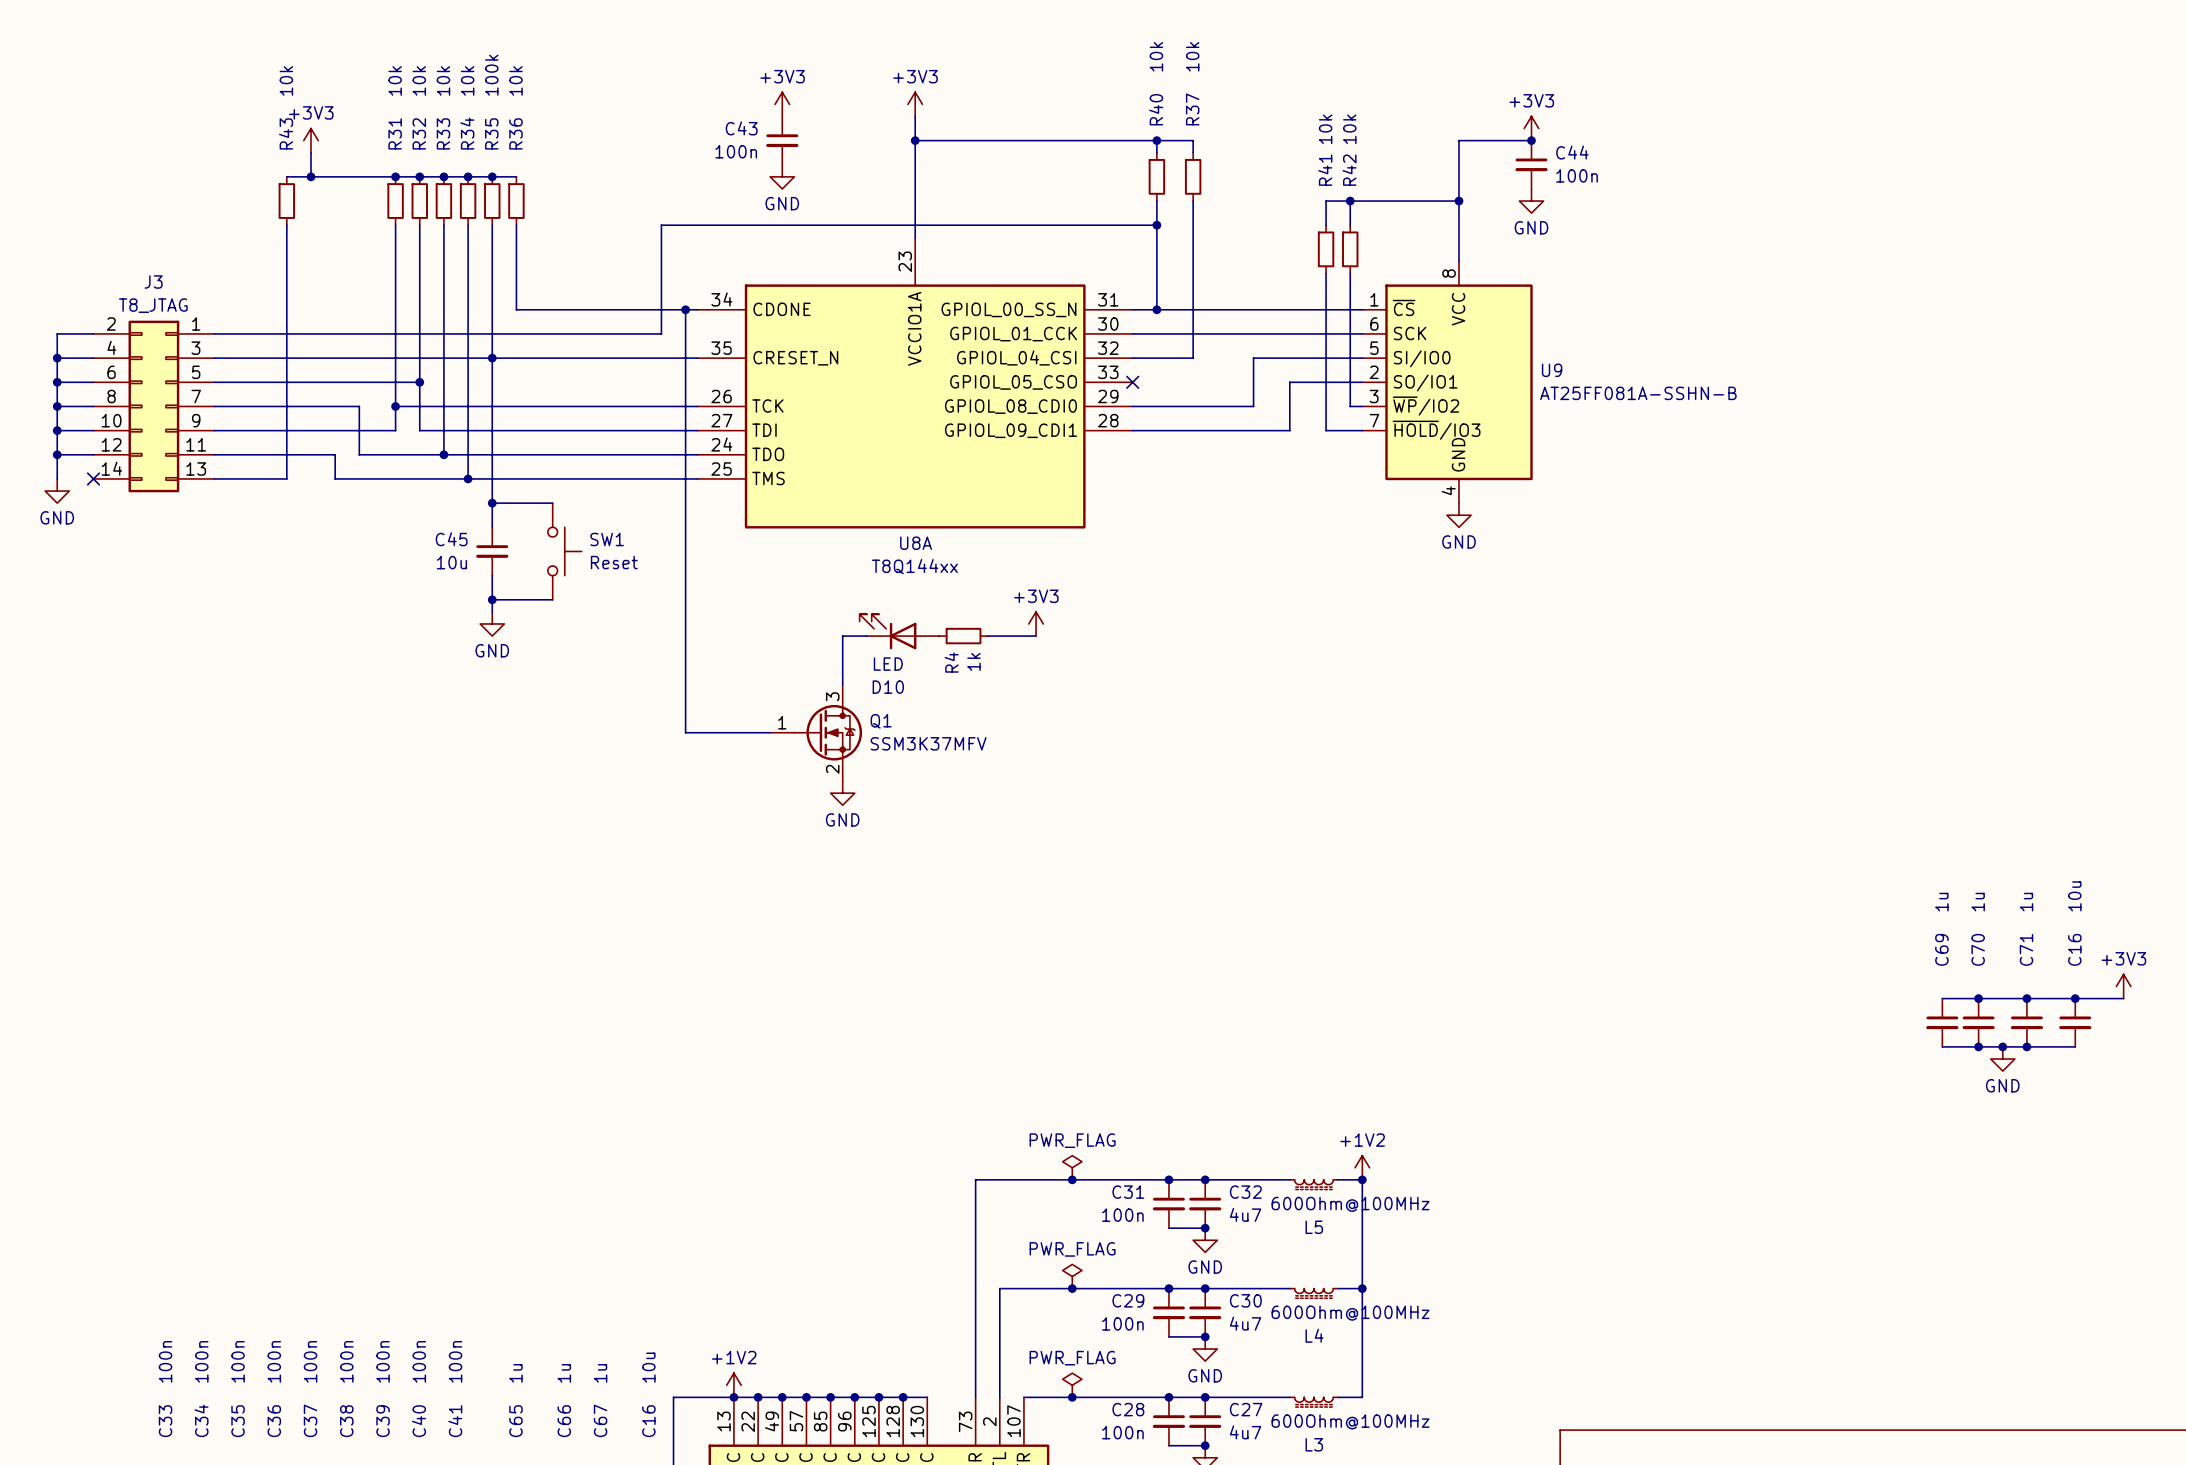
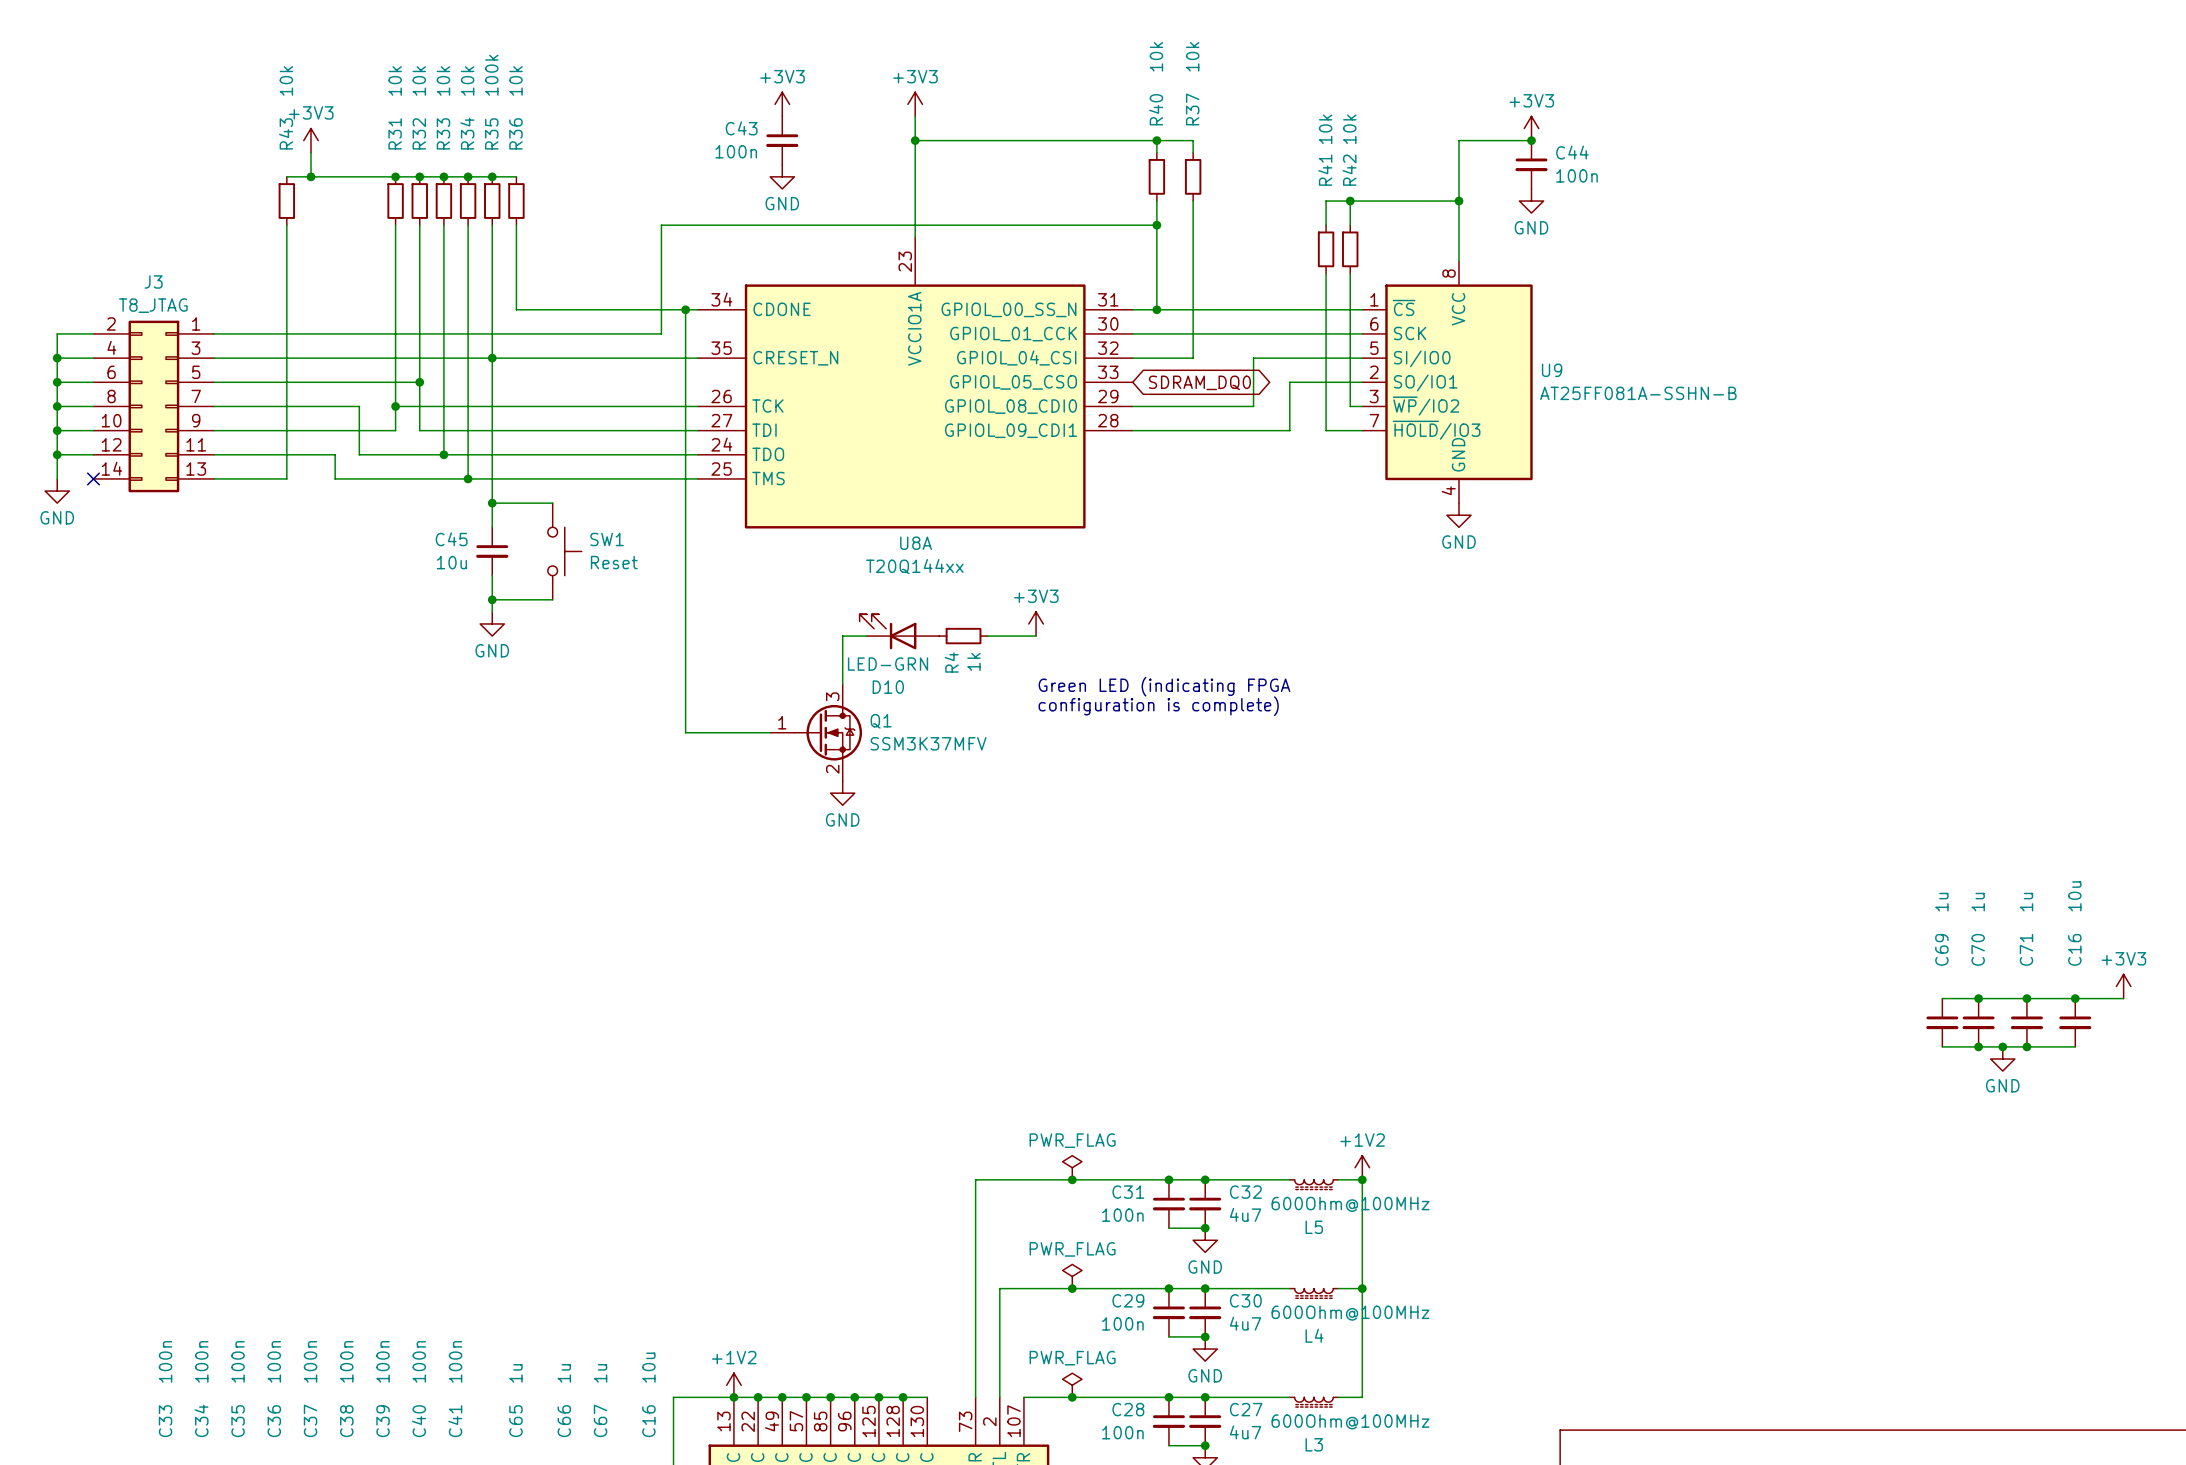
no-connect mark: (1132, 382) -> none
global label: none -> SDRAM_DQ0 (1199, 382)
U8A value: T8Q144xx (914, 566) -> T20Q144xx (914, 566)
D10 value: LED (888, 664) -> LED-GRN (888, 664)
text: none -> Green LED (indicating FPGA (1164, 686)
text: none -> configuration is complete) (1158, 706)

